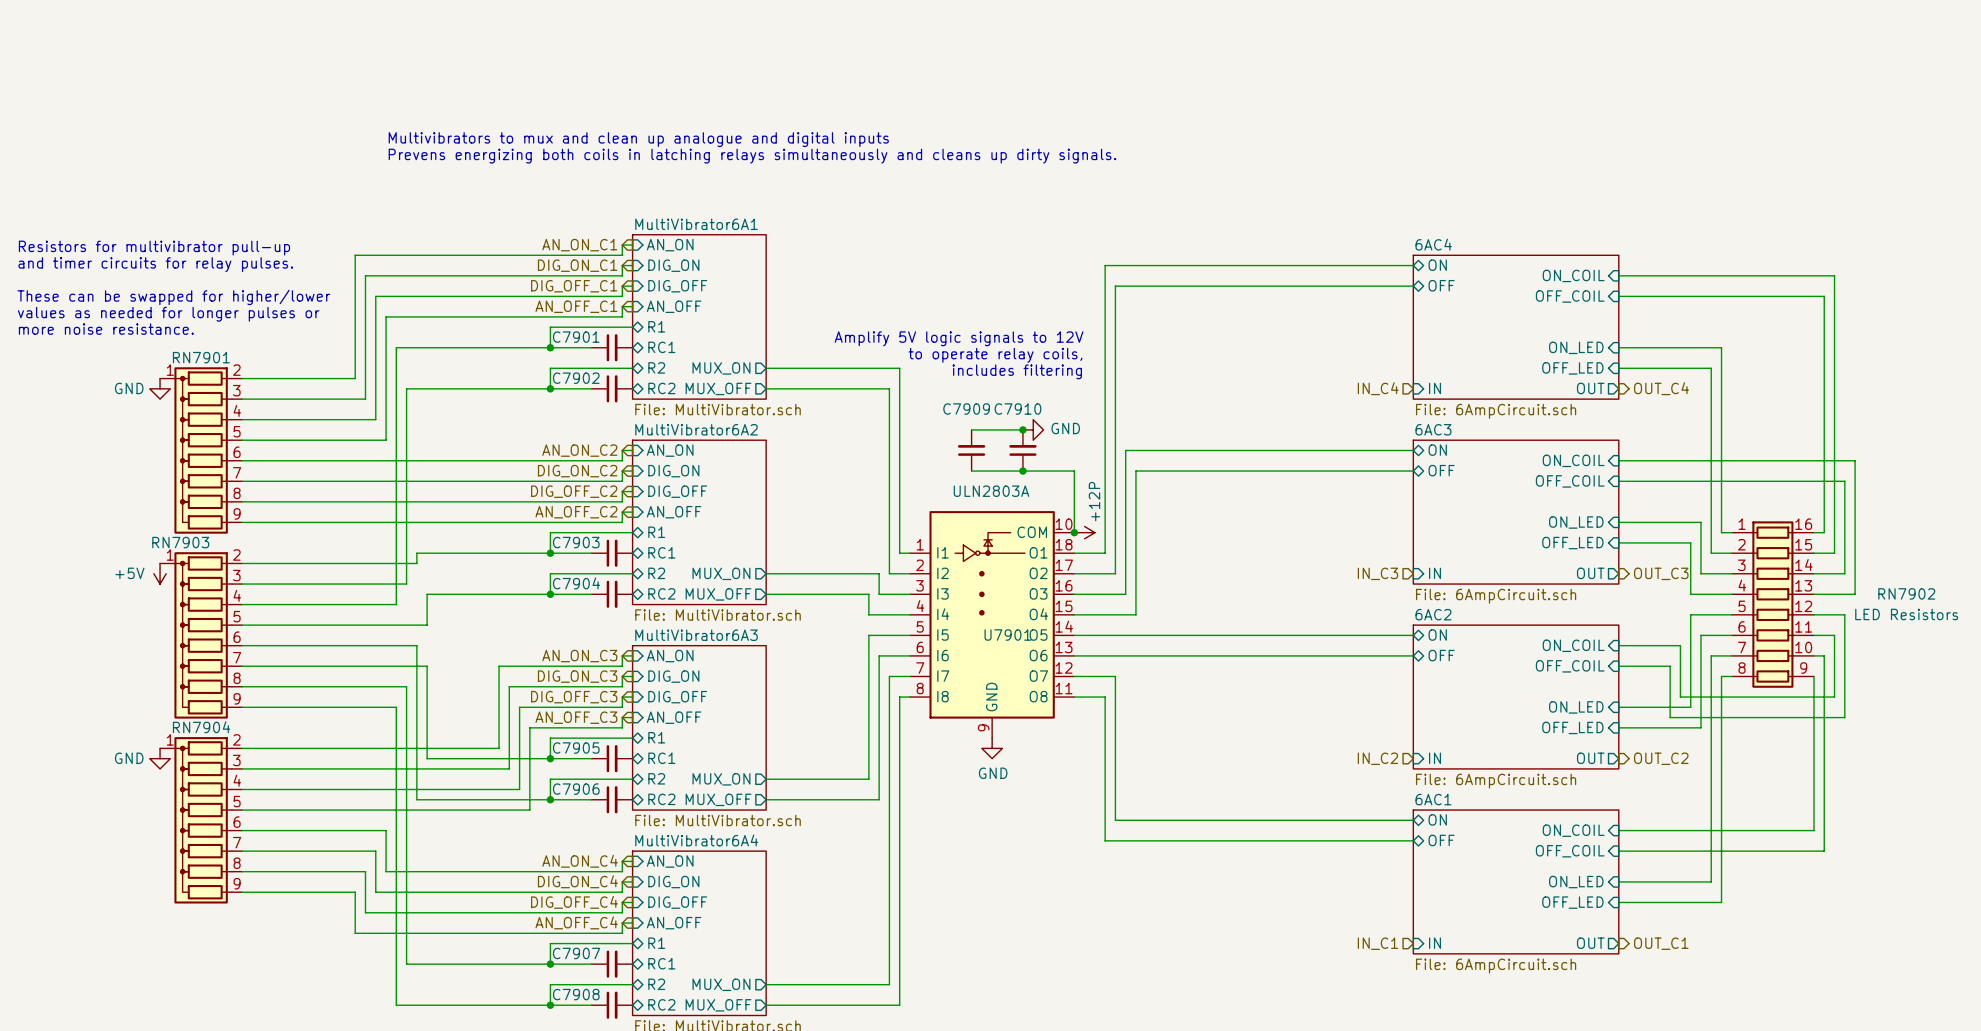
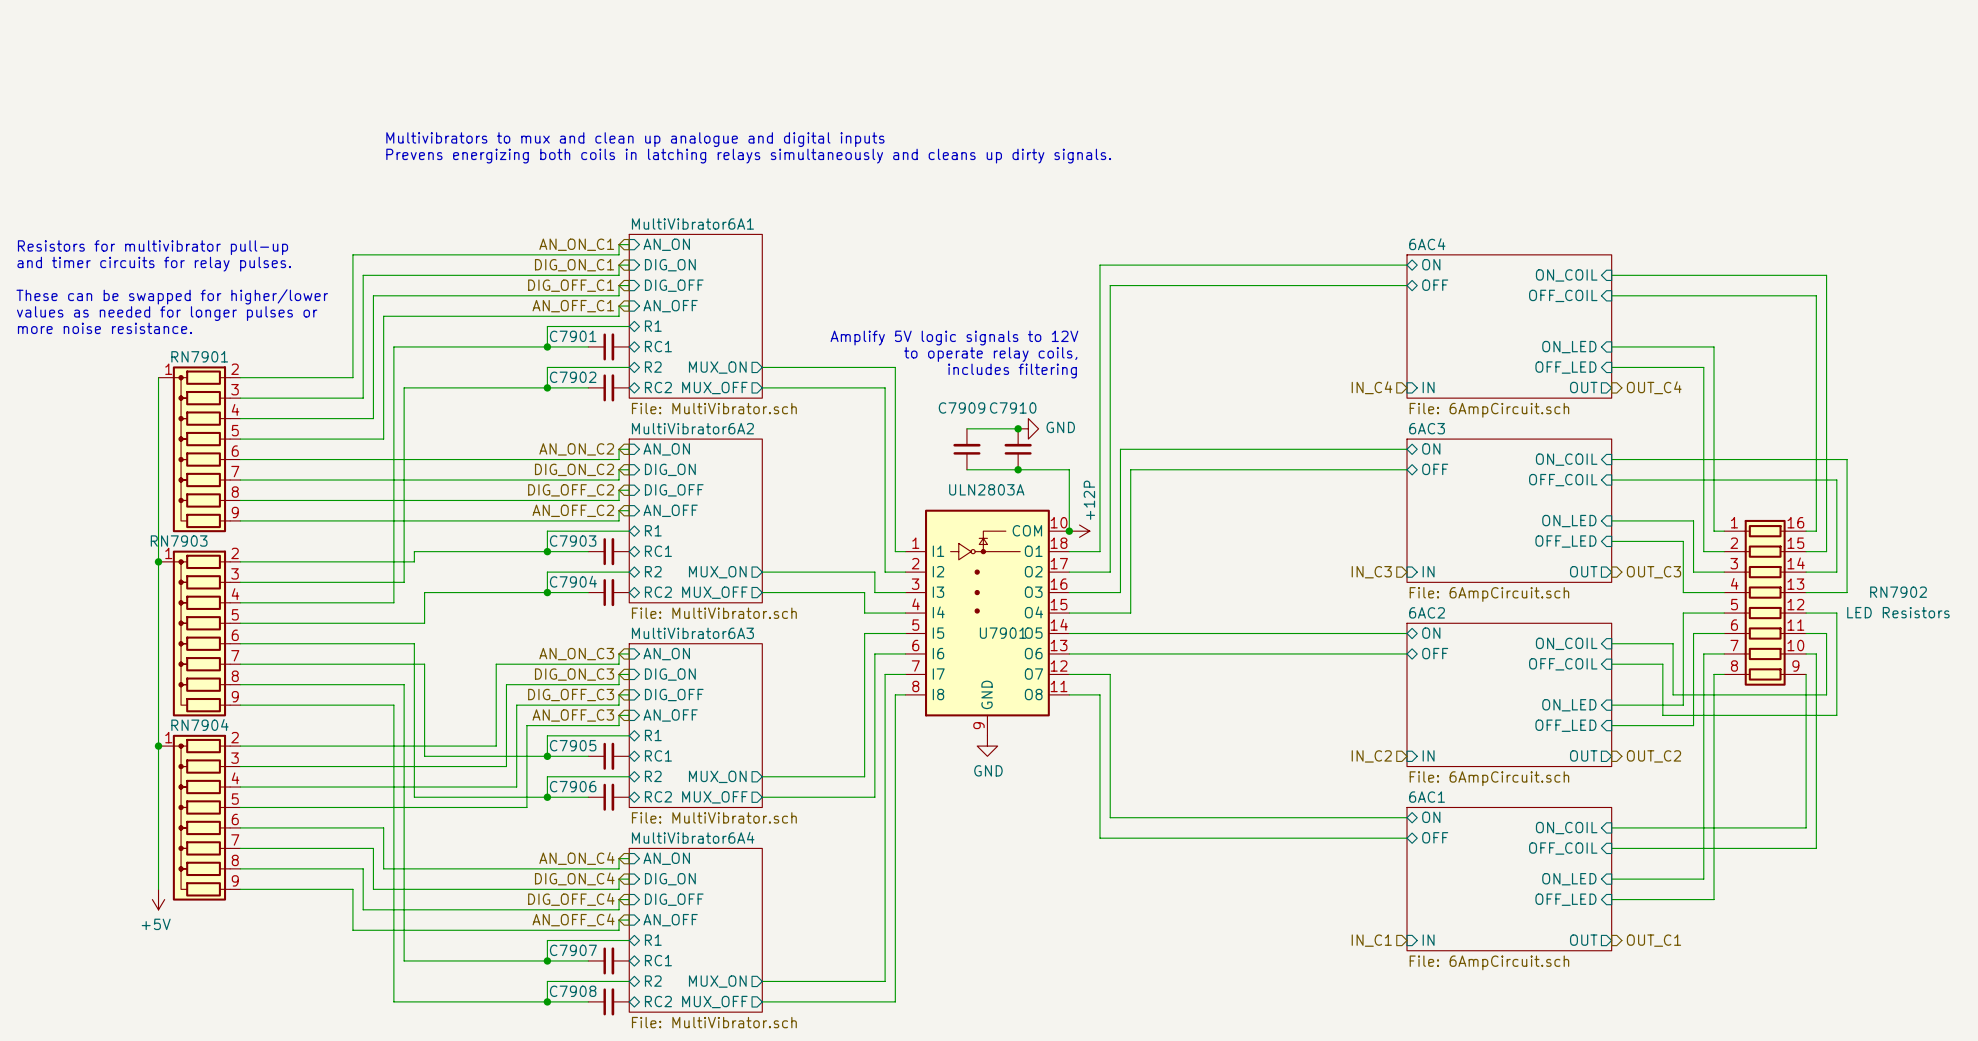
wire: none -> (158, 377) (158, 889)
power symbol: GND (160, 388) -> none
junction: none -> (158, 561)
power symbol: +5V (160, 573) -> none
junction: none -> (158, 746)
power symbol: GND (160, 758) -> none
power symbol: none -> +5V (158, 899)

